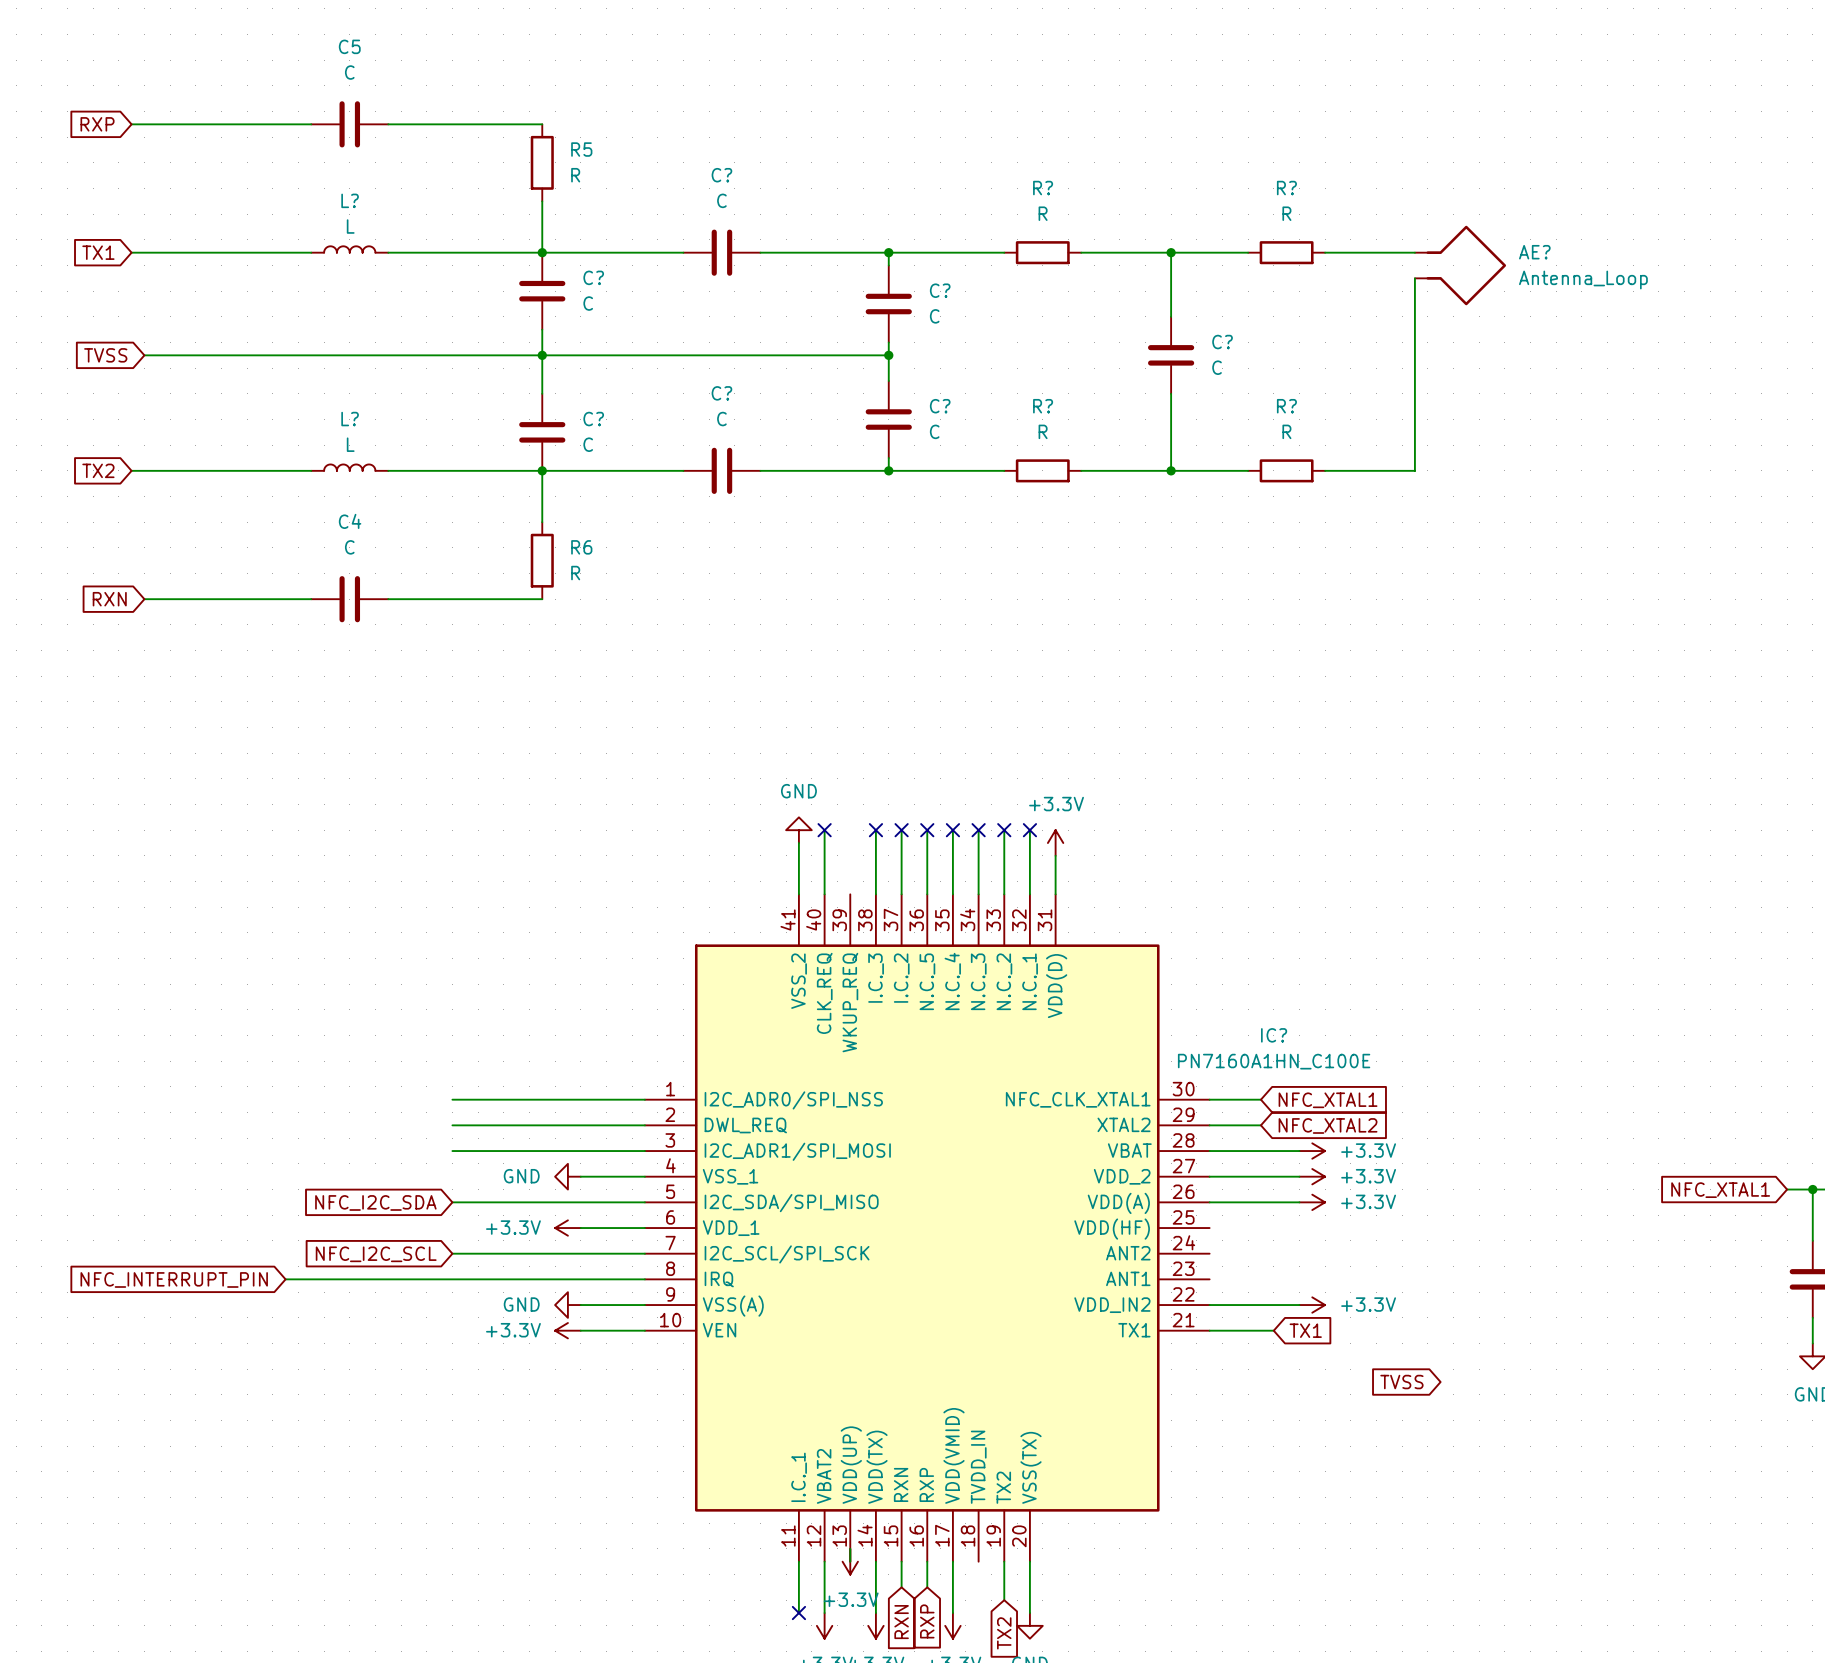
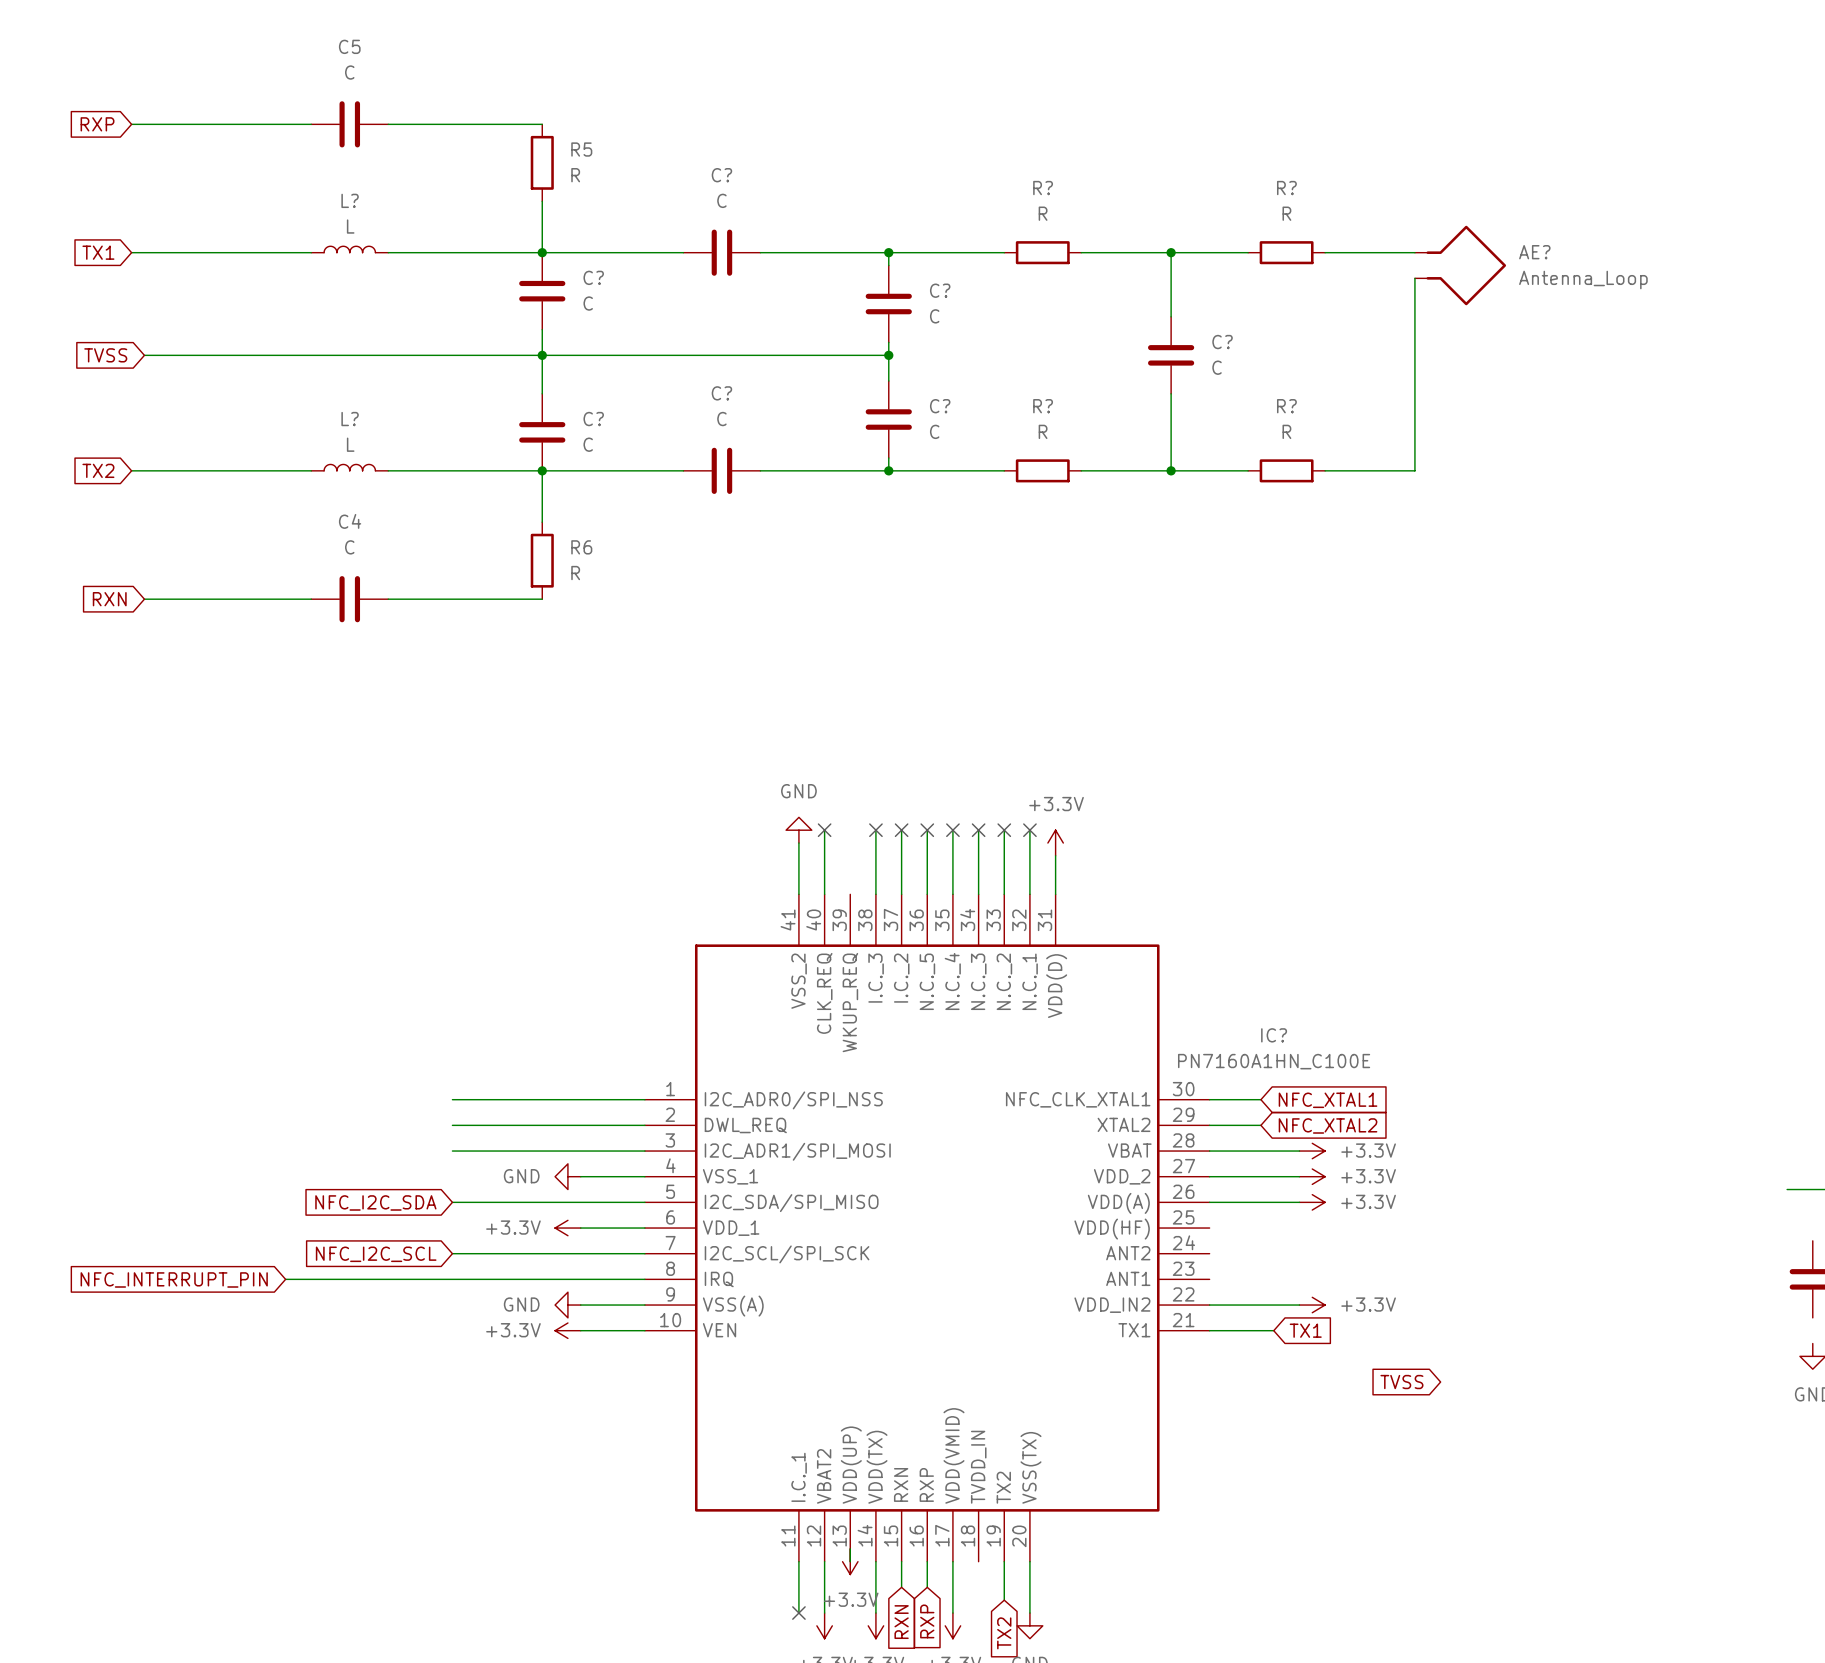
wire: (1812, 1189) (1812, 1240) -> none
junction: (1812, 1189) -> none
global label: NFC_XTAL1 (1720, 1190) -> none
wire: (1812, 1317) (1812, 1343) -> none

